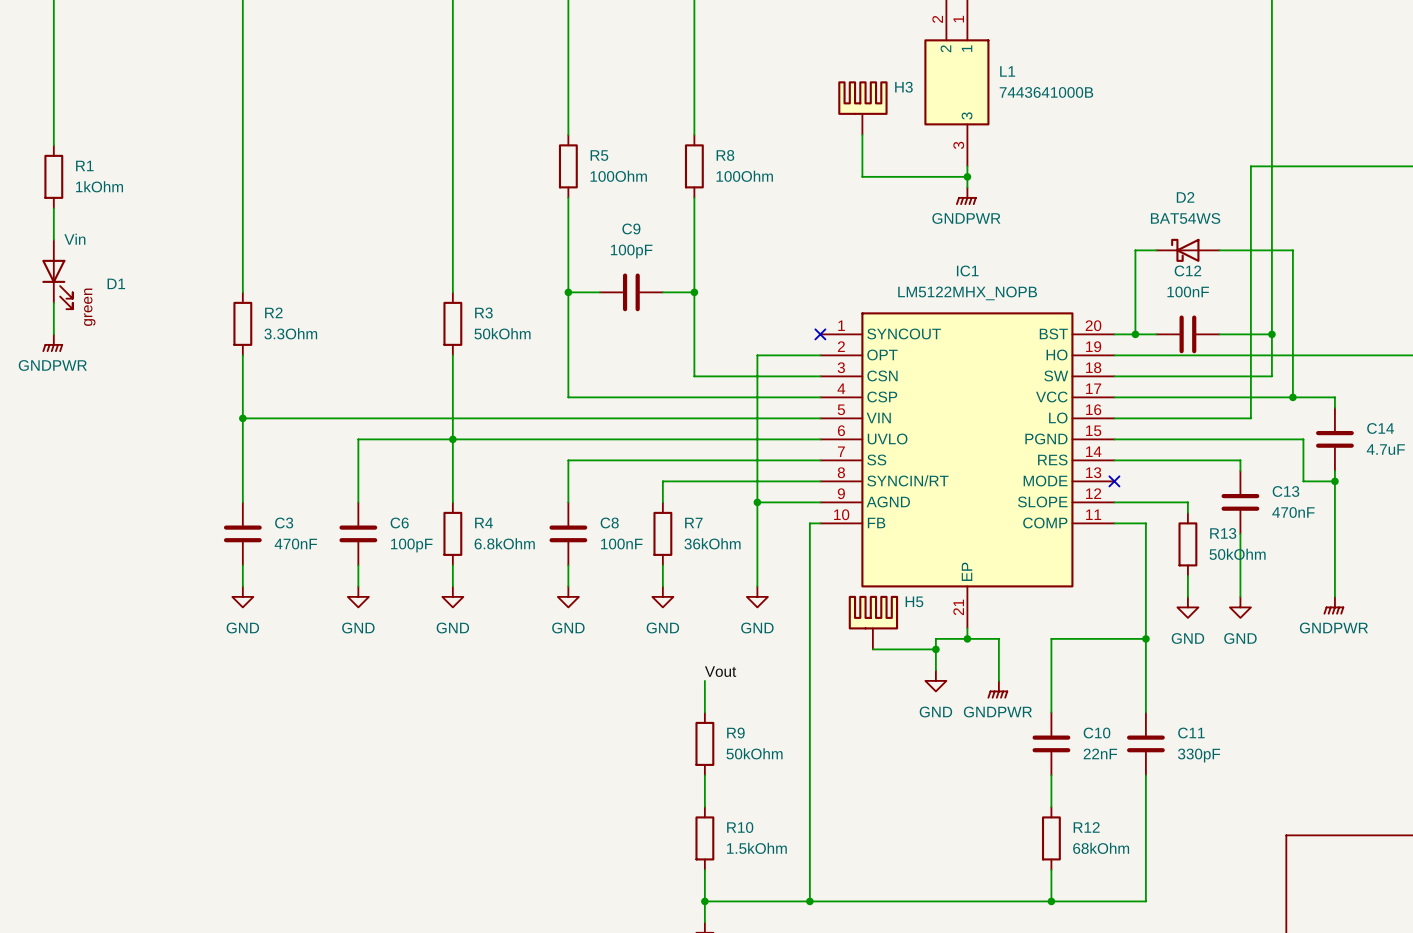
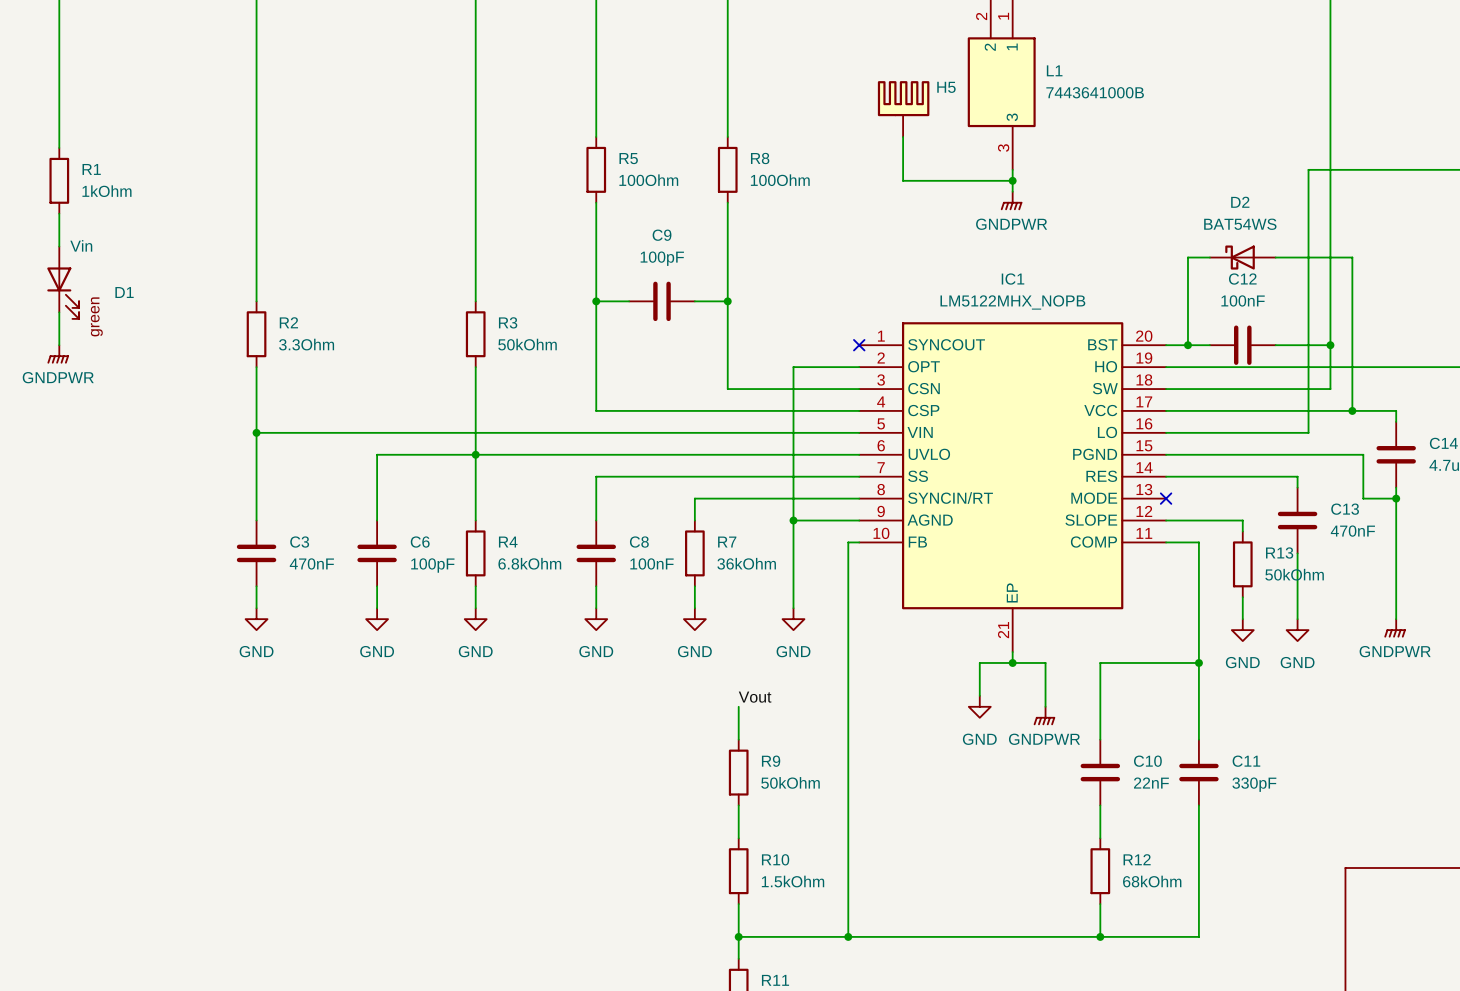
H3 name: H3 (903, 87) -> H5 (946, 87)
H5: (873, 622) -> none
wire: (872, 649) (935, 649) -> none
junction: (935, 649) -> none

